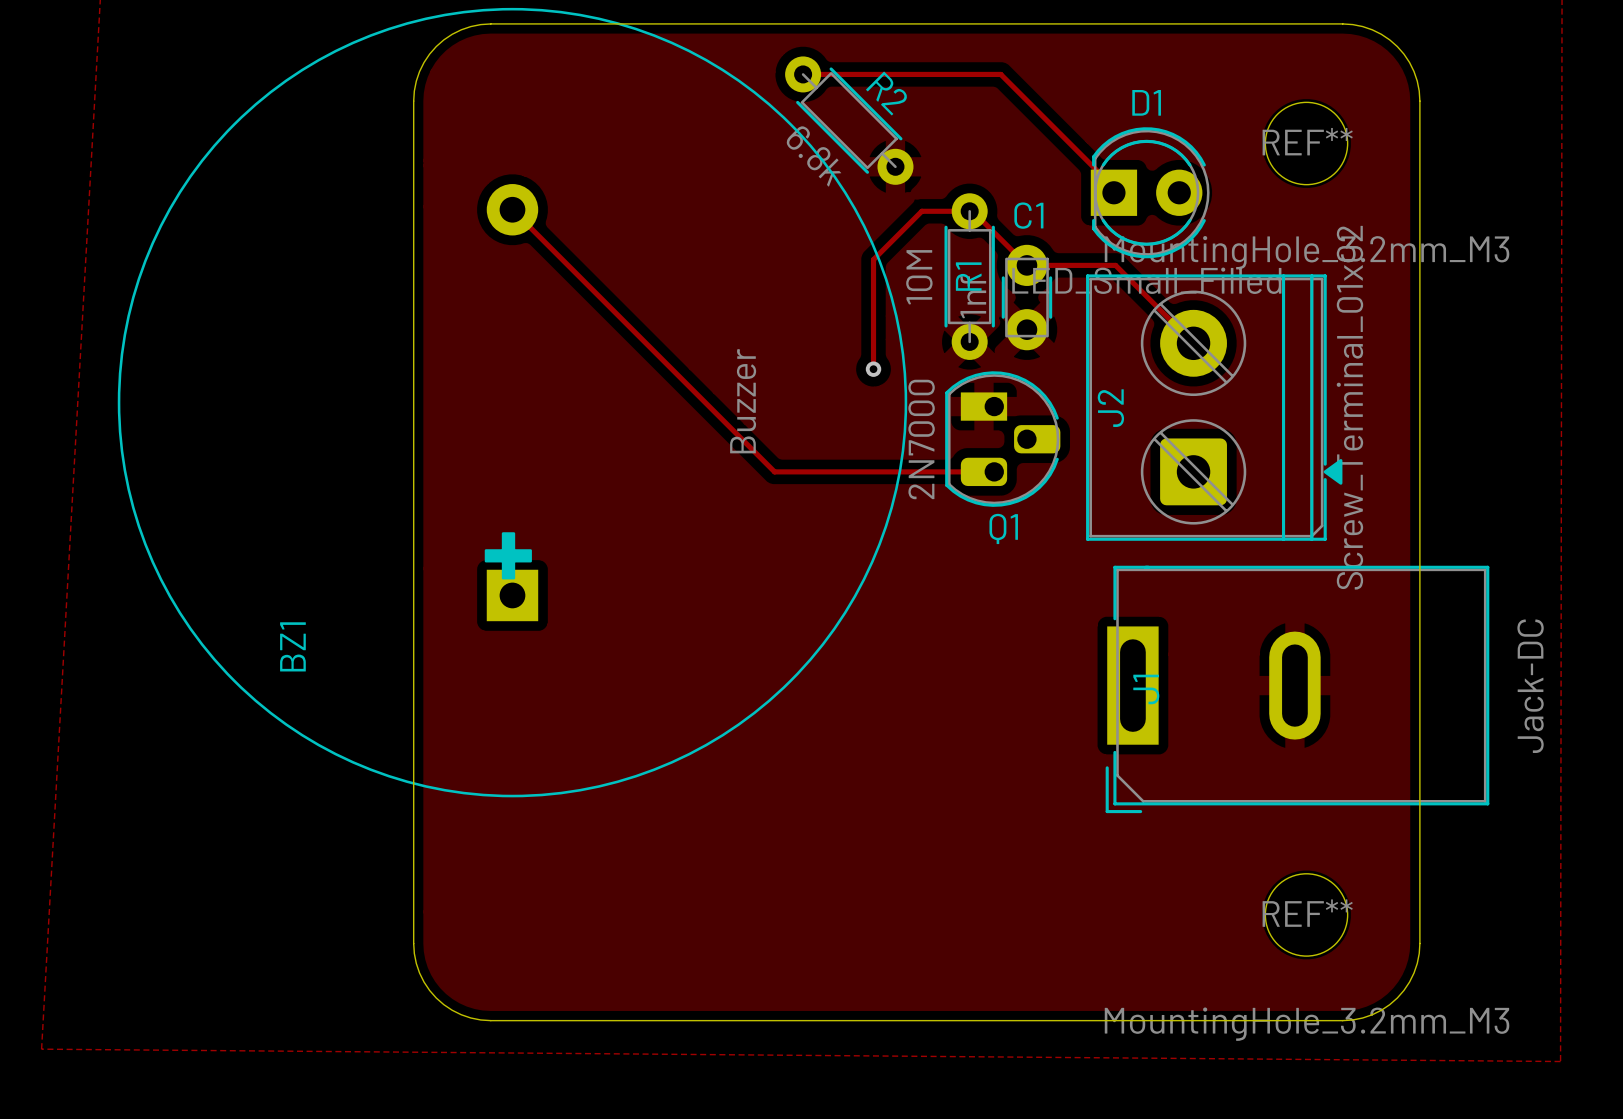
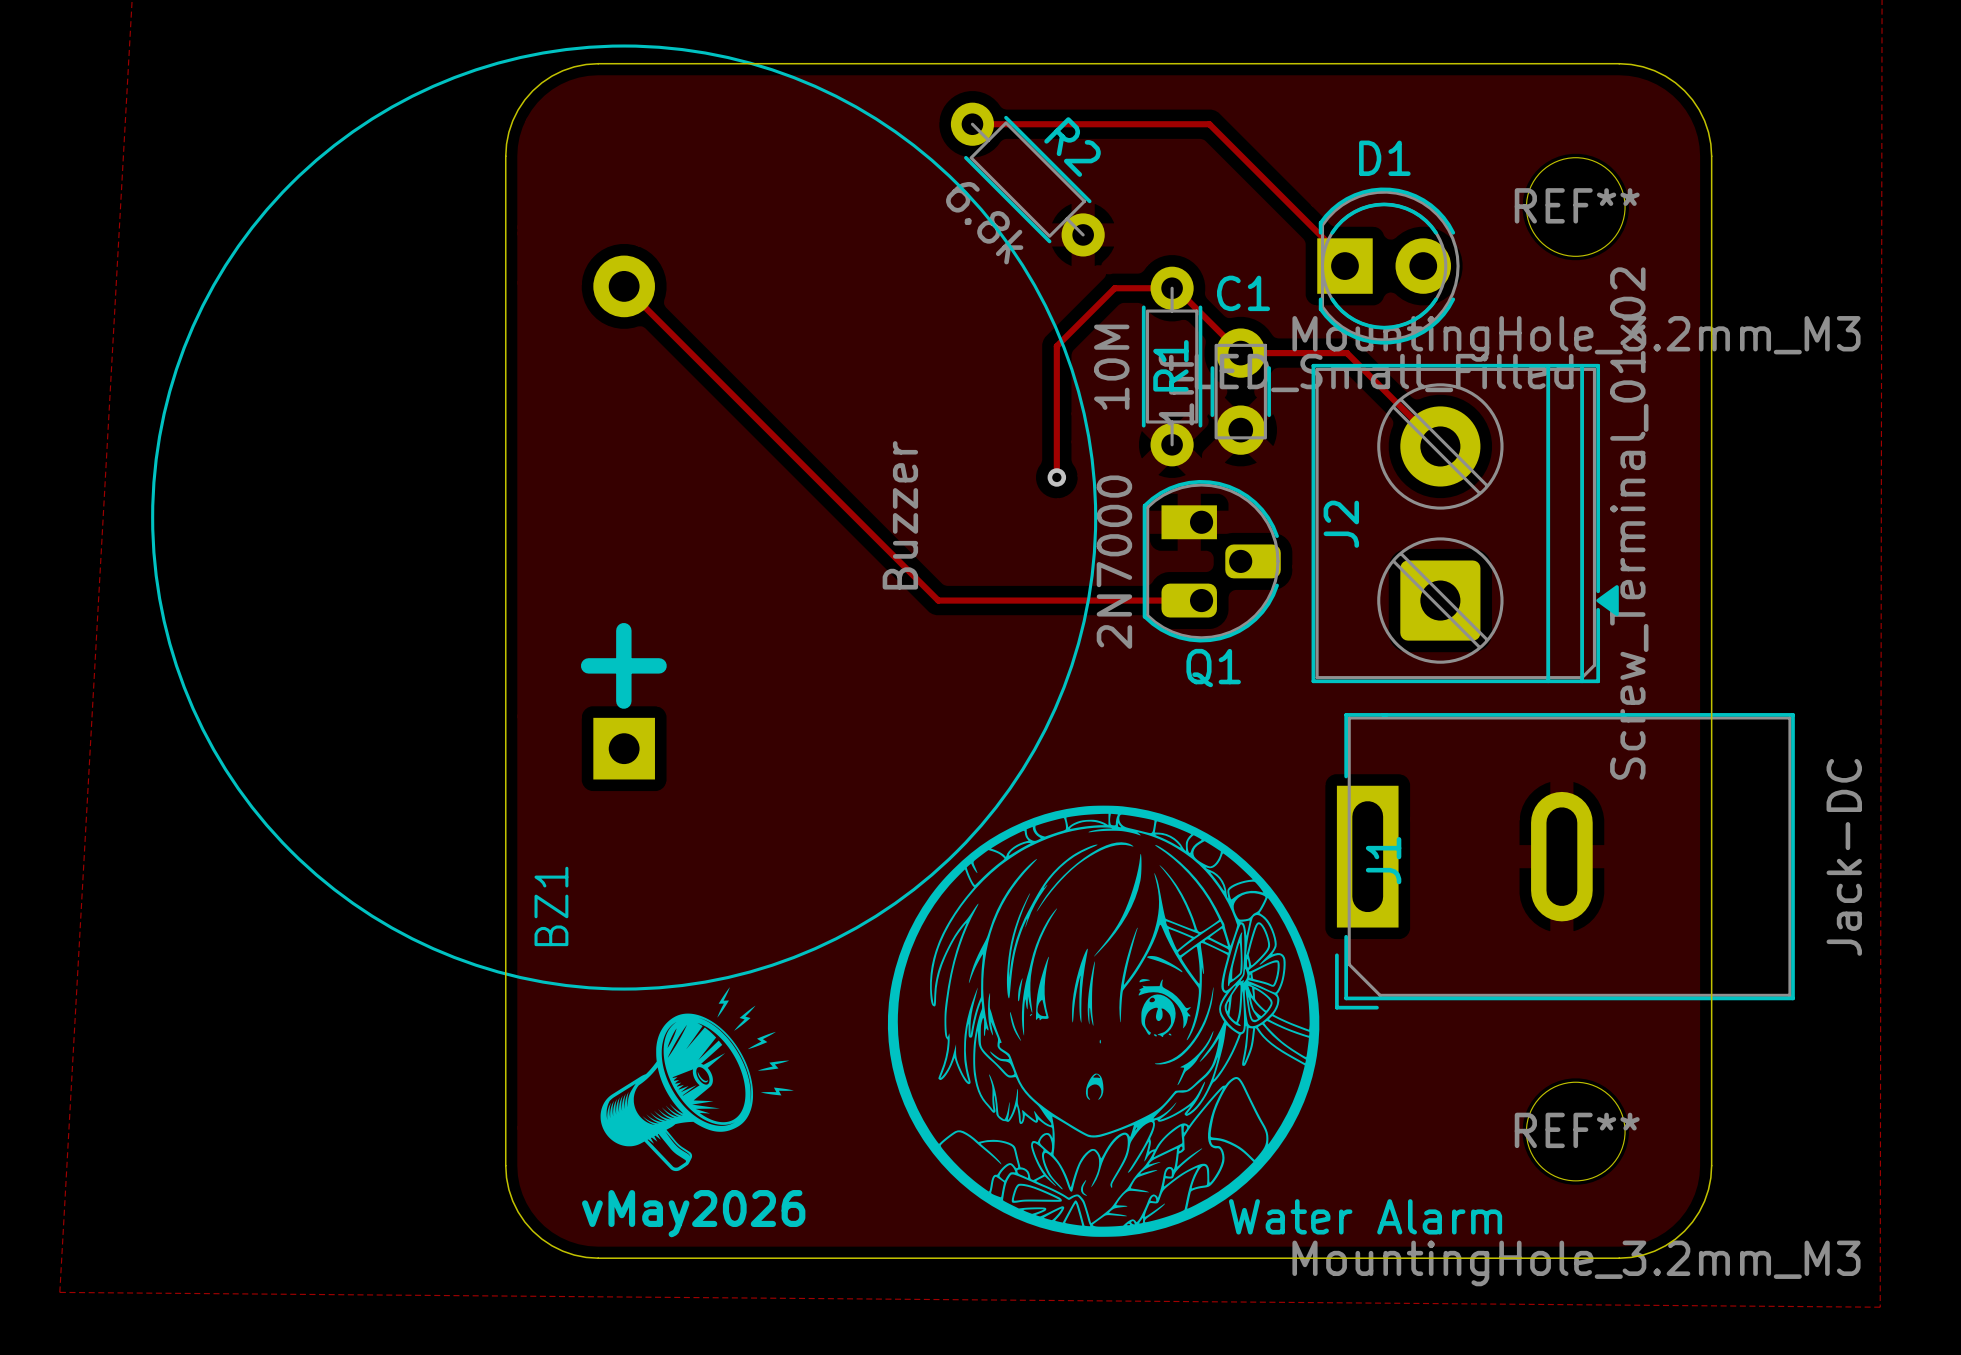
drawing: none -> [887, 805, 1320, 1237]
BZ1 name position: BZ1 (292, 646) -> BZ1 (551, 906)
drawing: none -> [600, 987, 794, 1172]
text: none -> vMay2026 (693, 1213)
text: none -> Water Alarm (1365, 1216)

